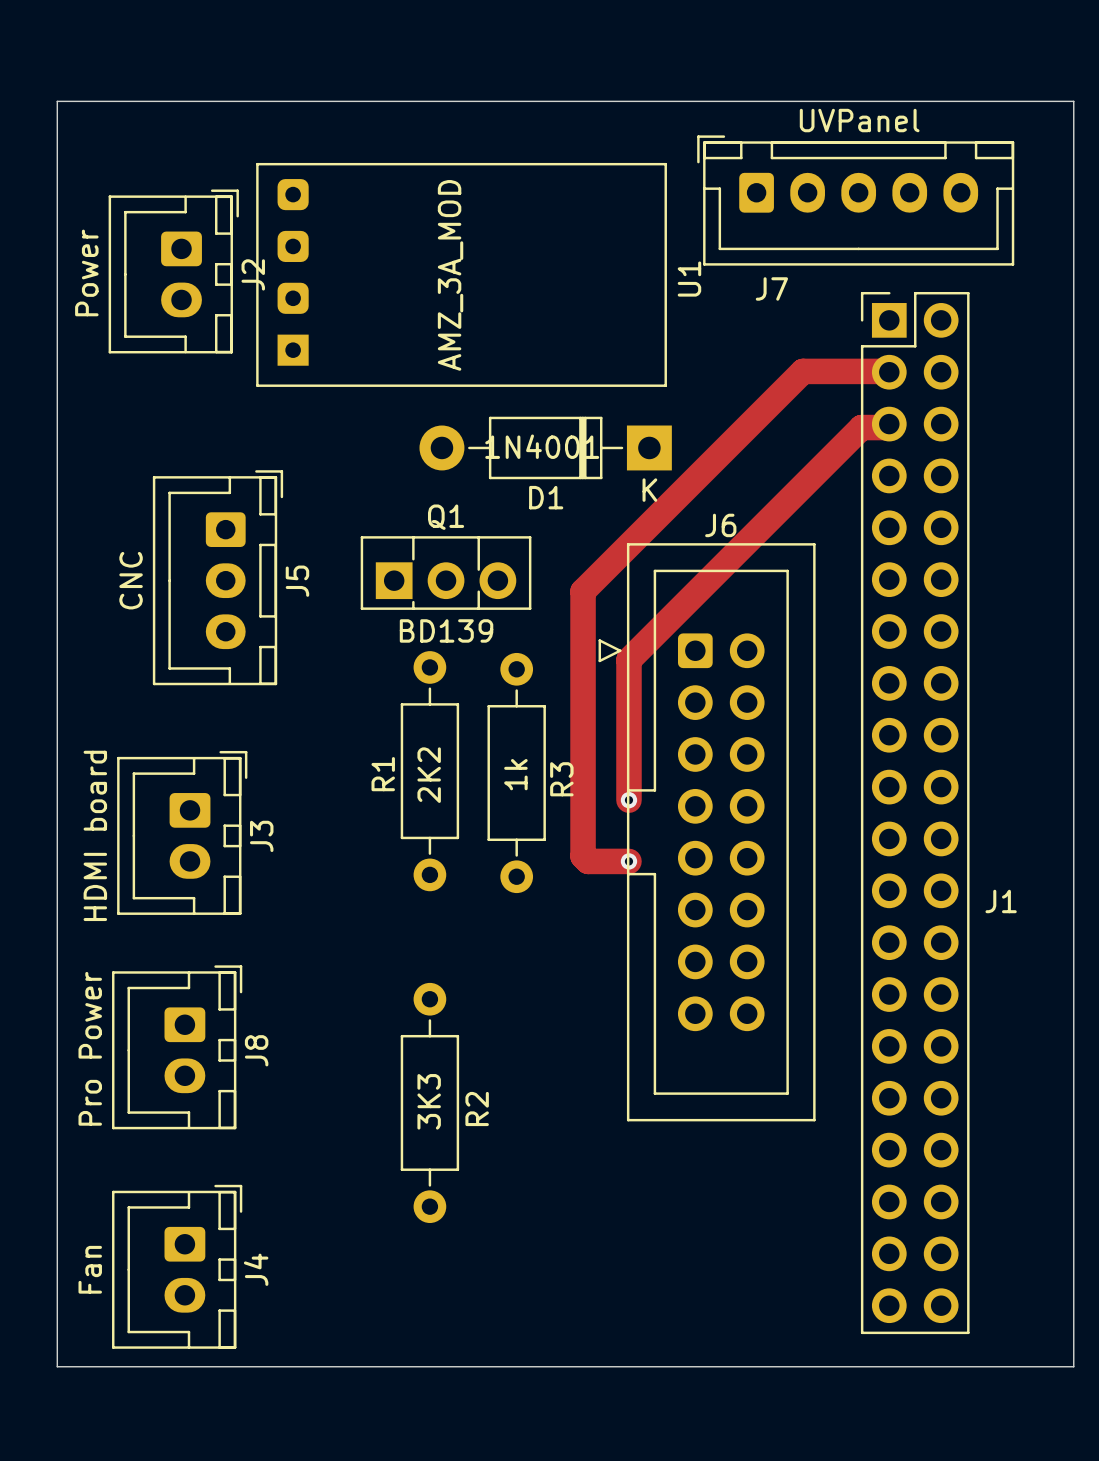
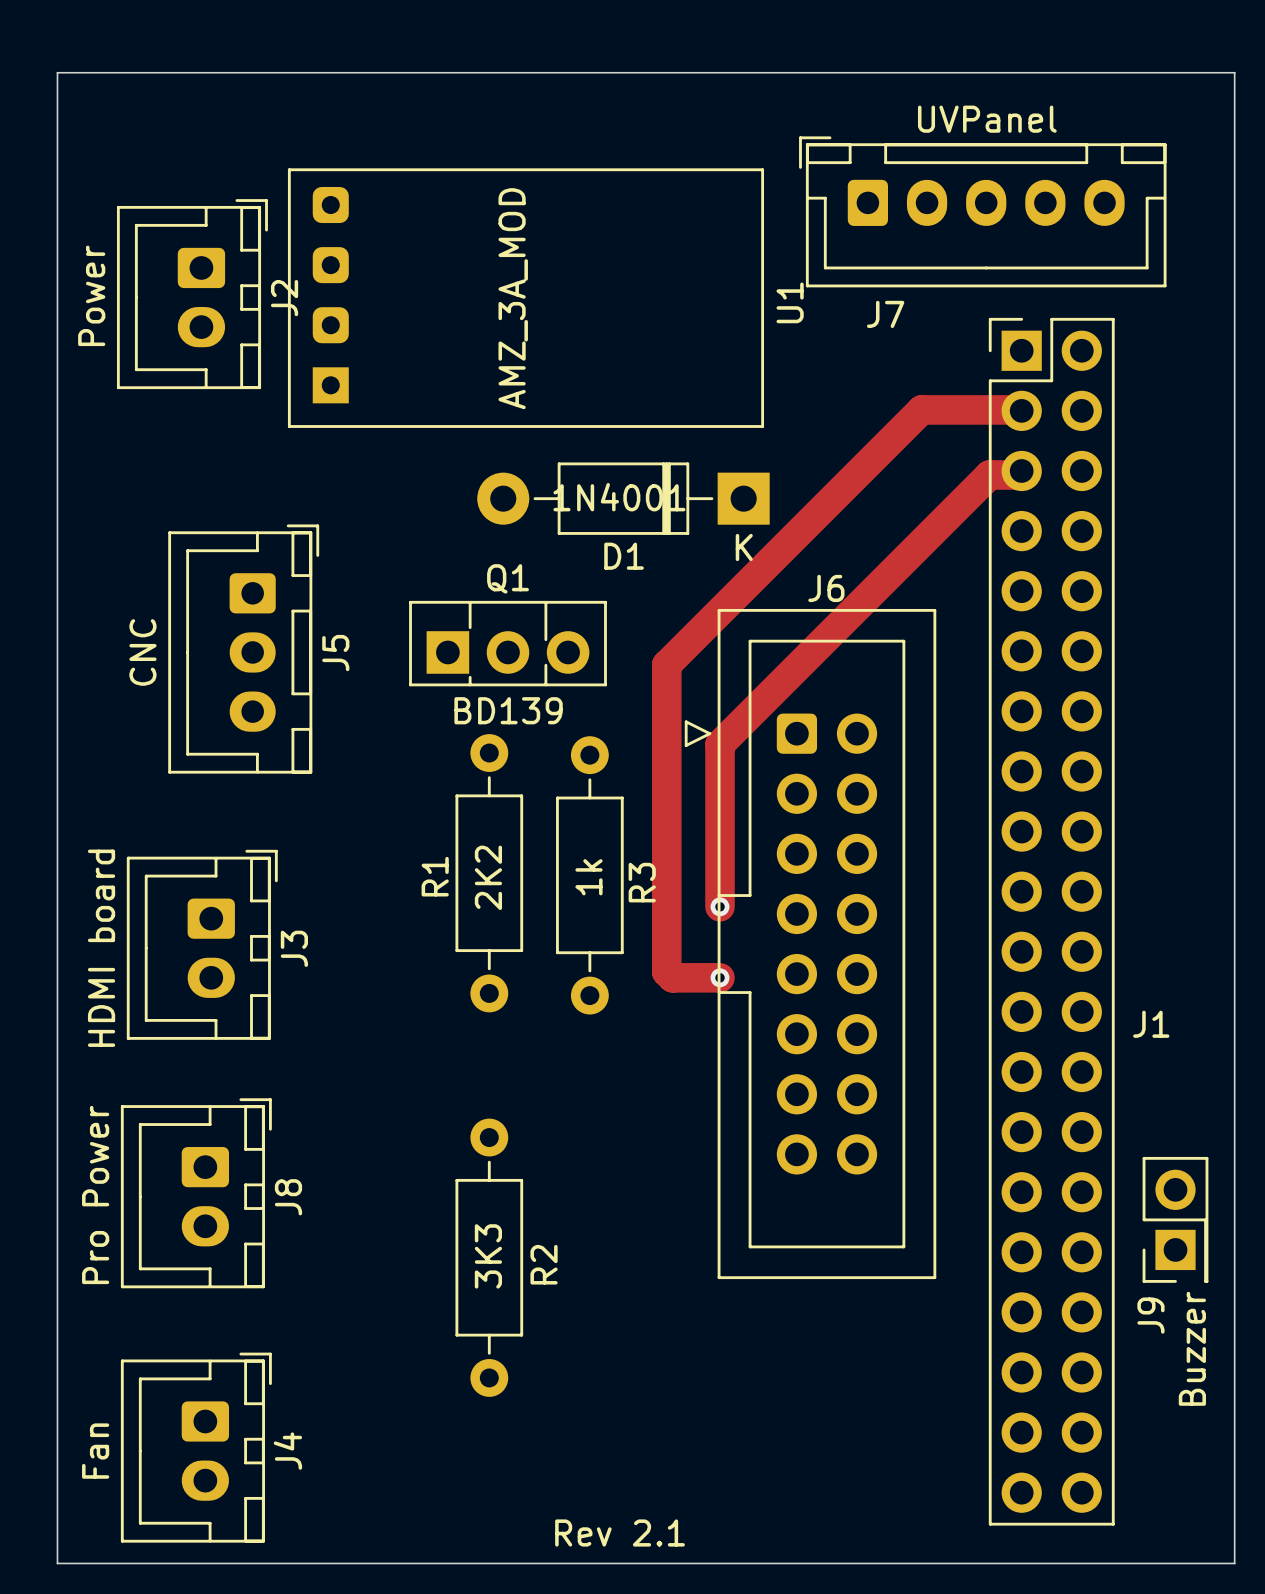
board edge: (57, 101) (1073, 101) (1073, 1366) -> (57, 96) (57, 72) (1234, 72) (1234, 1563)
J9: none -> Buzzer (1175, 1219)
text: none -> Rev 2.1 (620, 1533)

